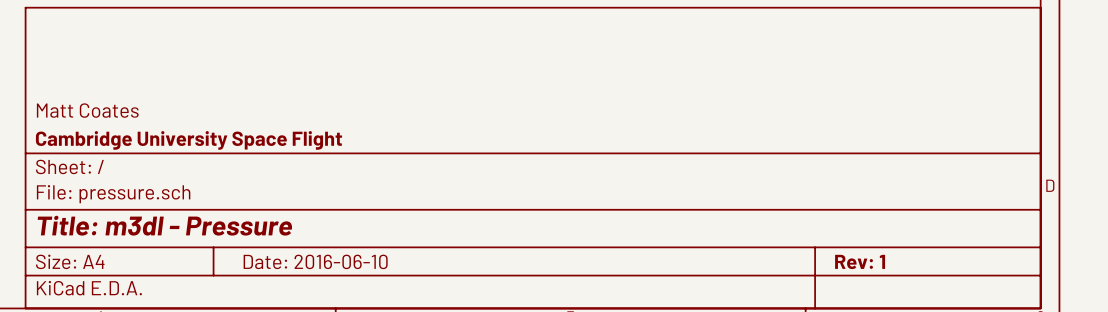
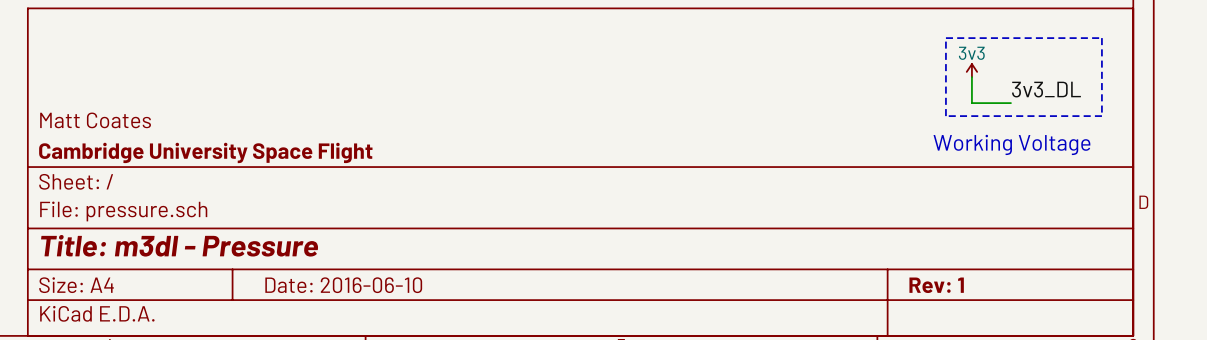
line: none -> (945, 38) (1101, 38) (1101, 116) (945, 116) (945, 38)
power symbol: none -> 3v3 (971, 70)
wire: none -> (971, 77) (971, 103) (1010, 103)
label: none -> 3v3_DL (1046, 89)
text: none -> Working Voltage (1011, 144)

